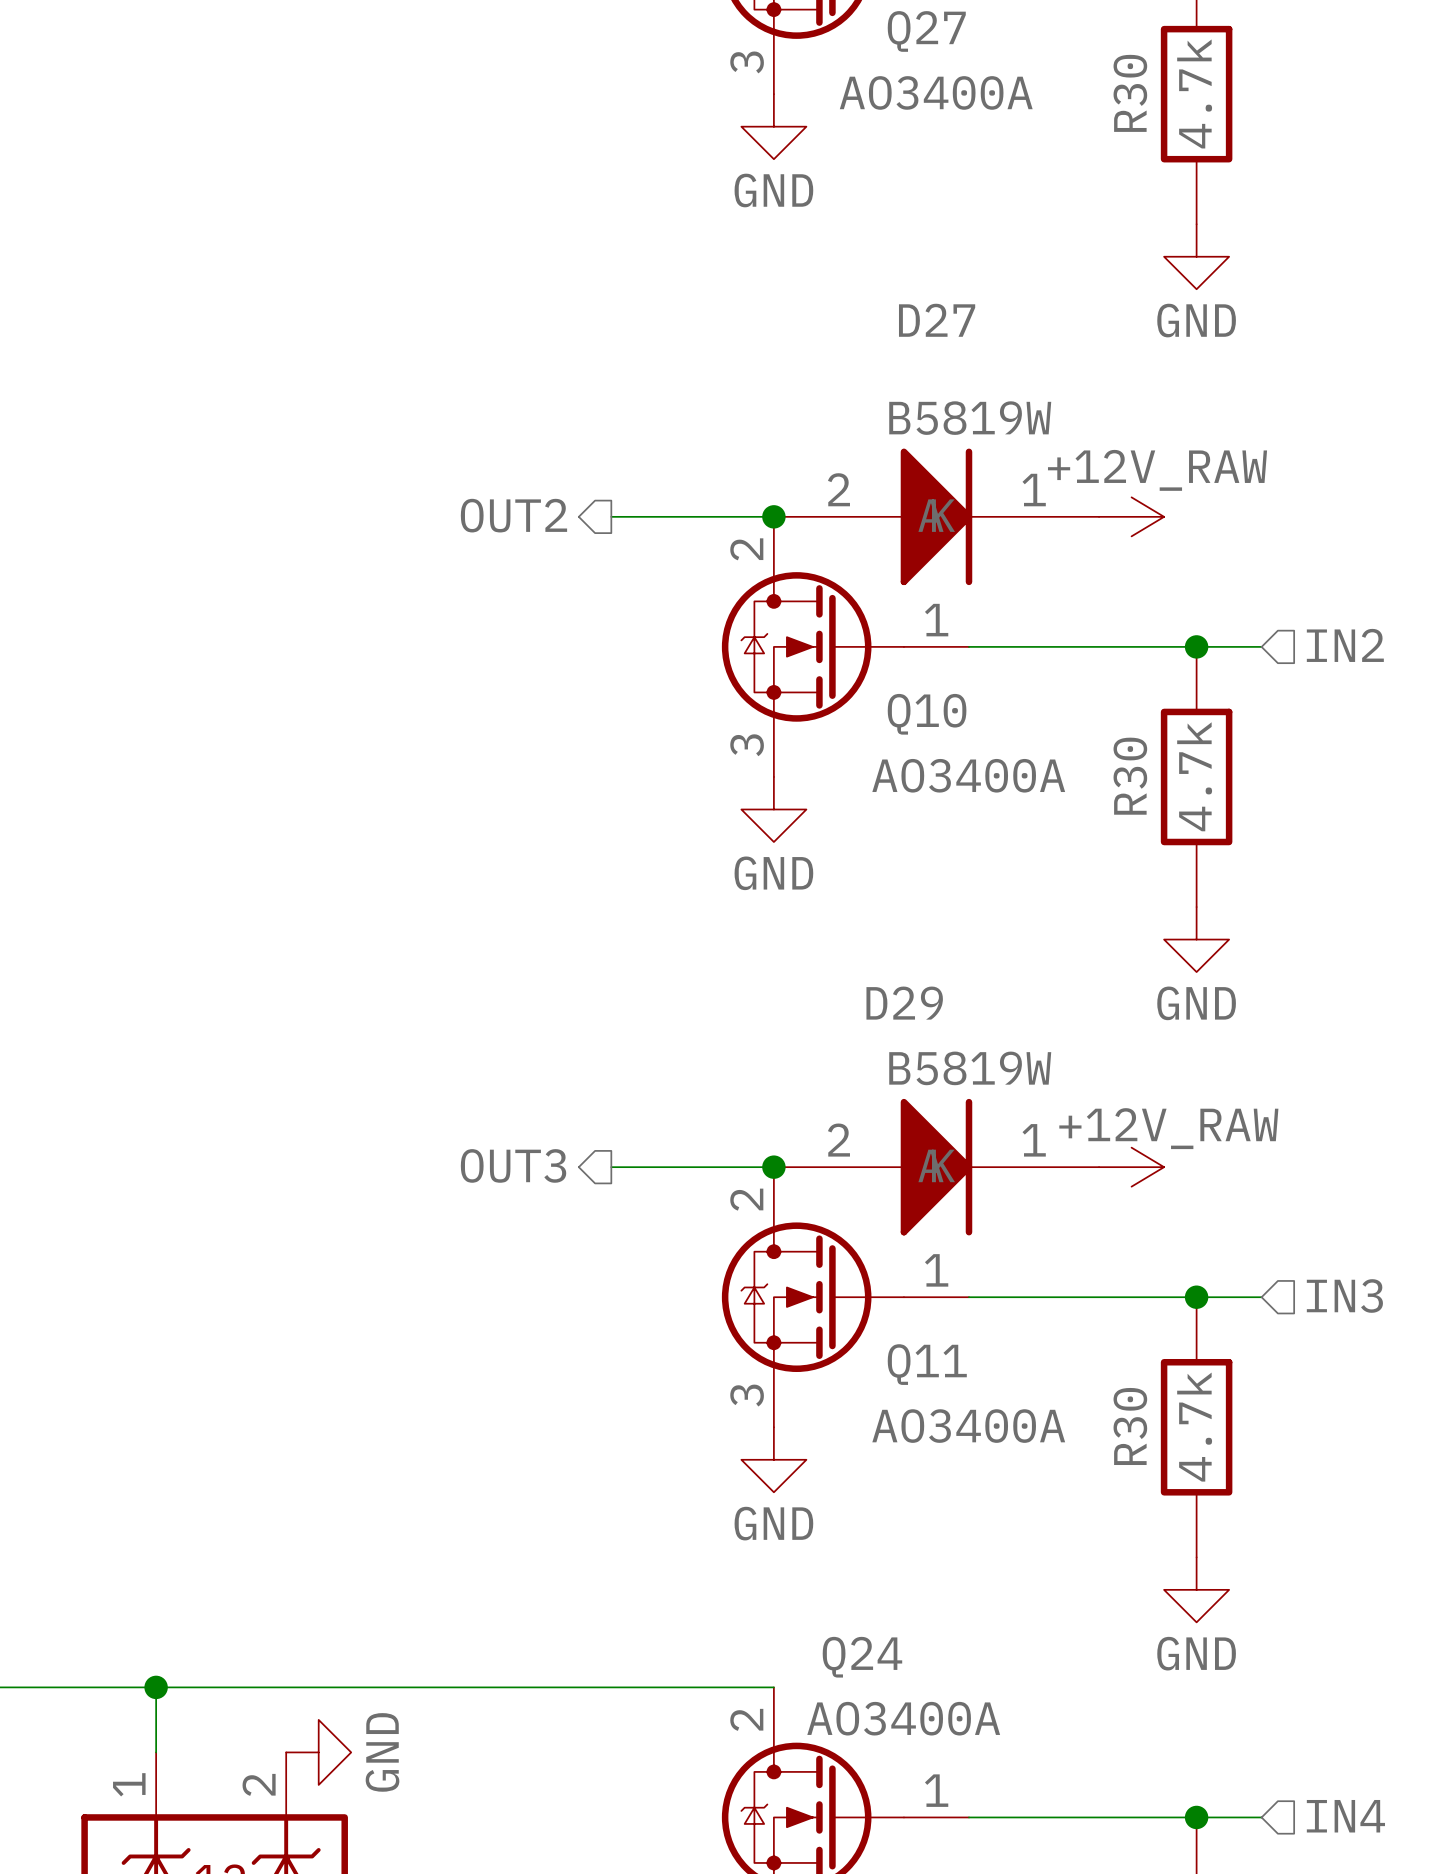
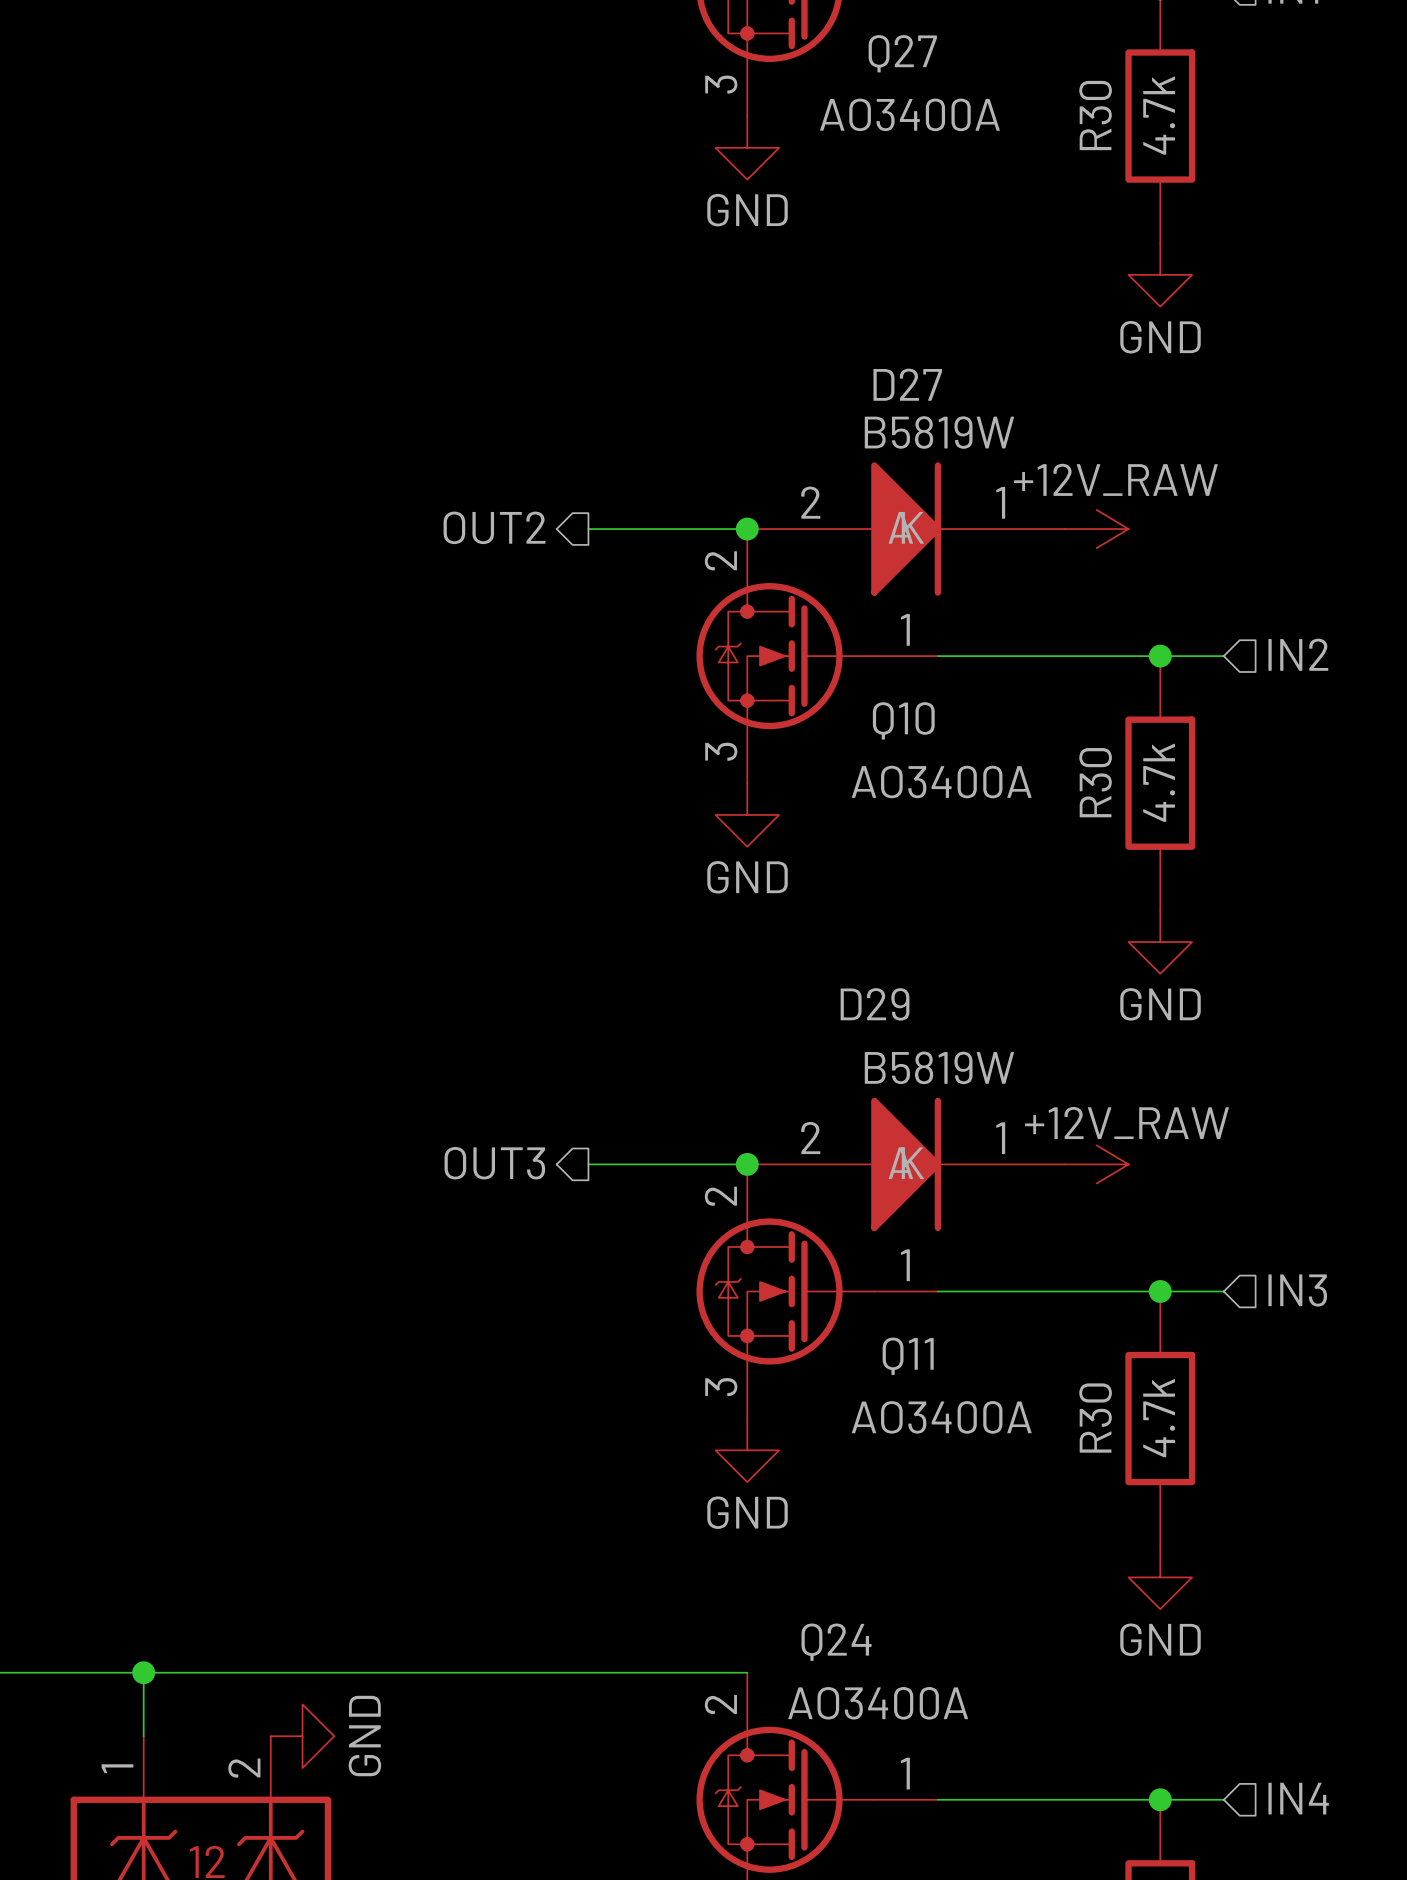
D27 name position: D27 (937, 320) -> D27 (907, 384)

